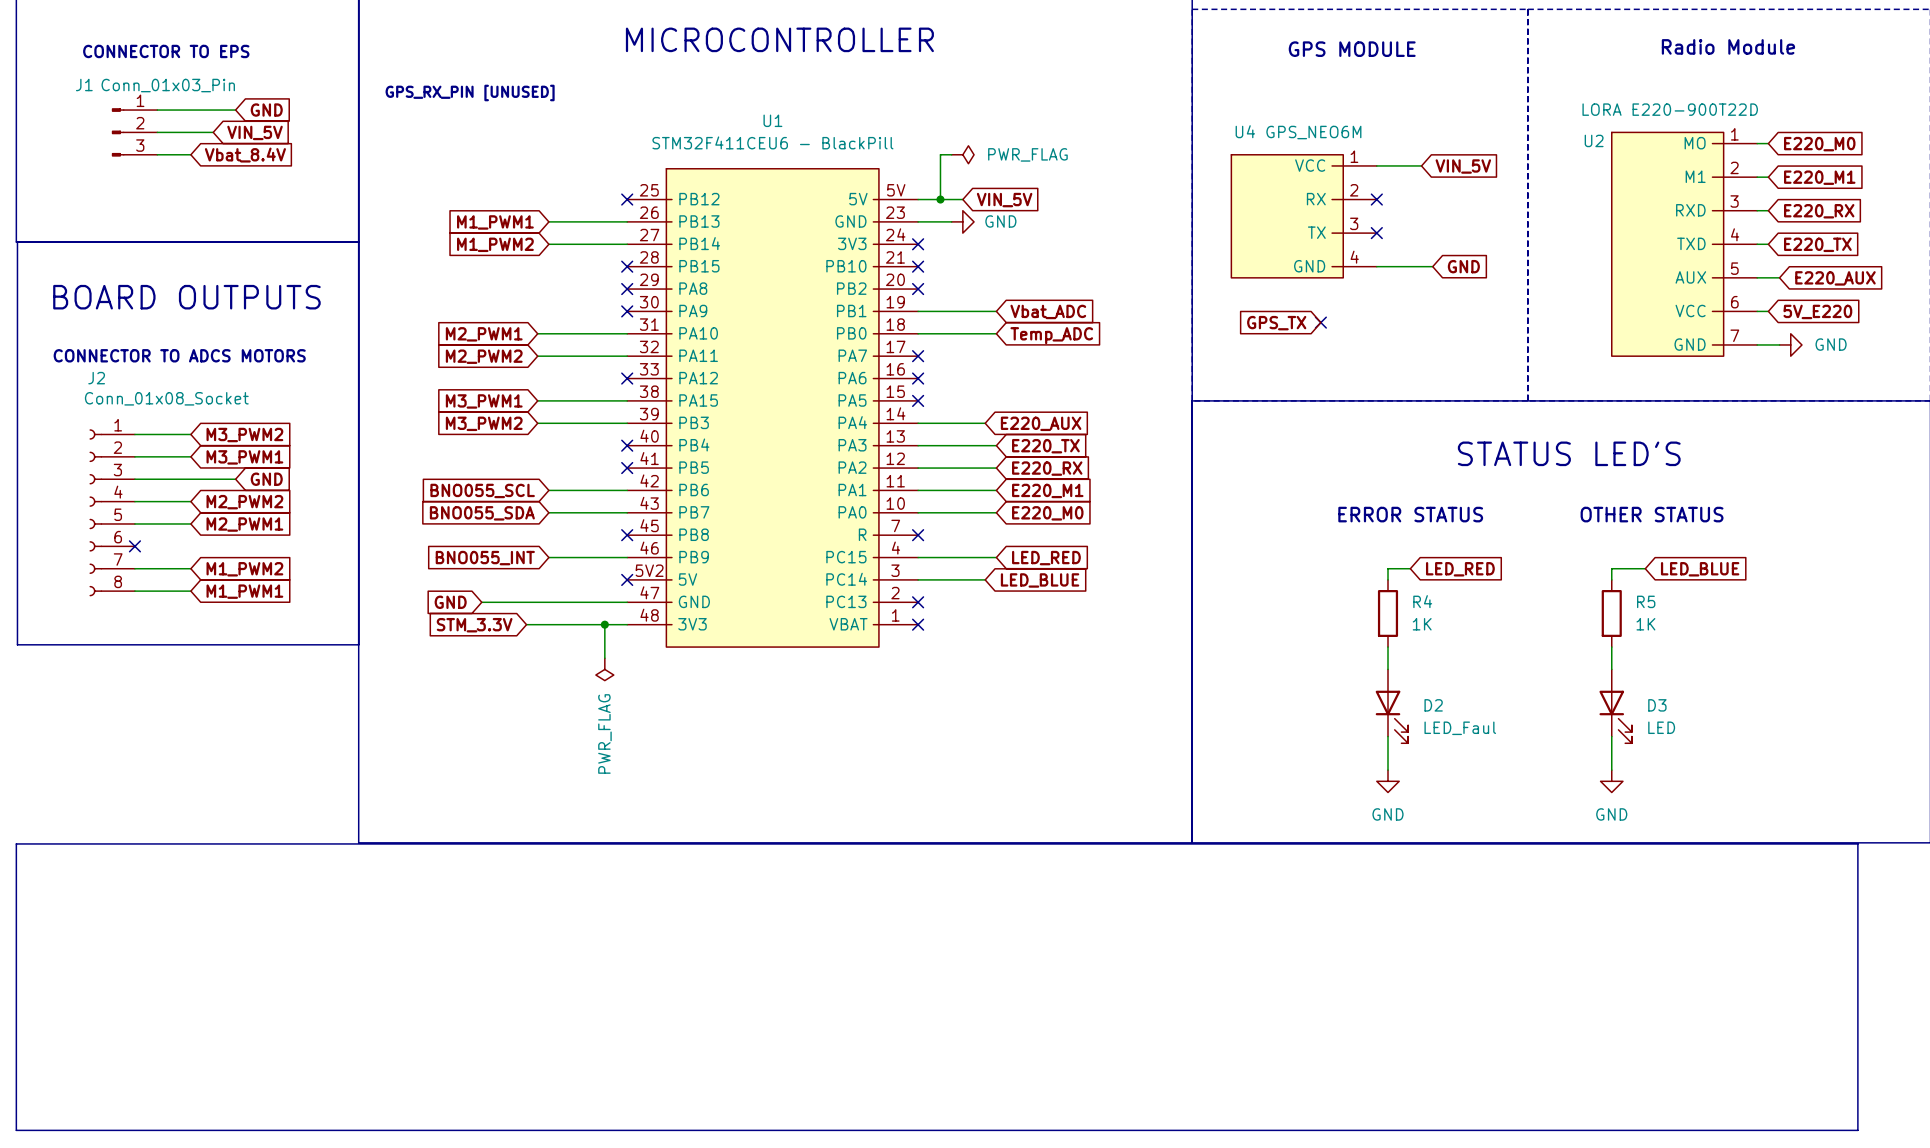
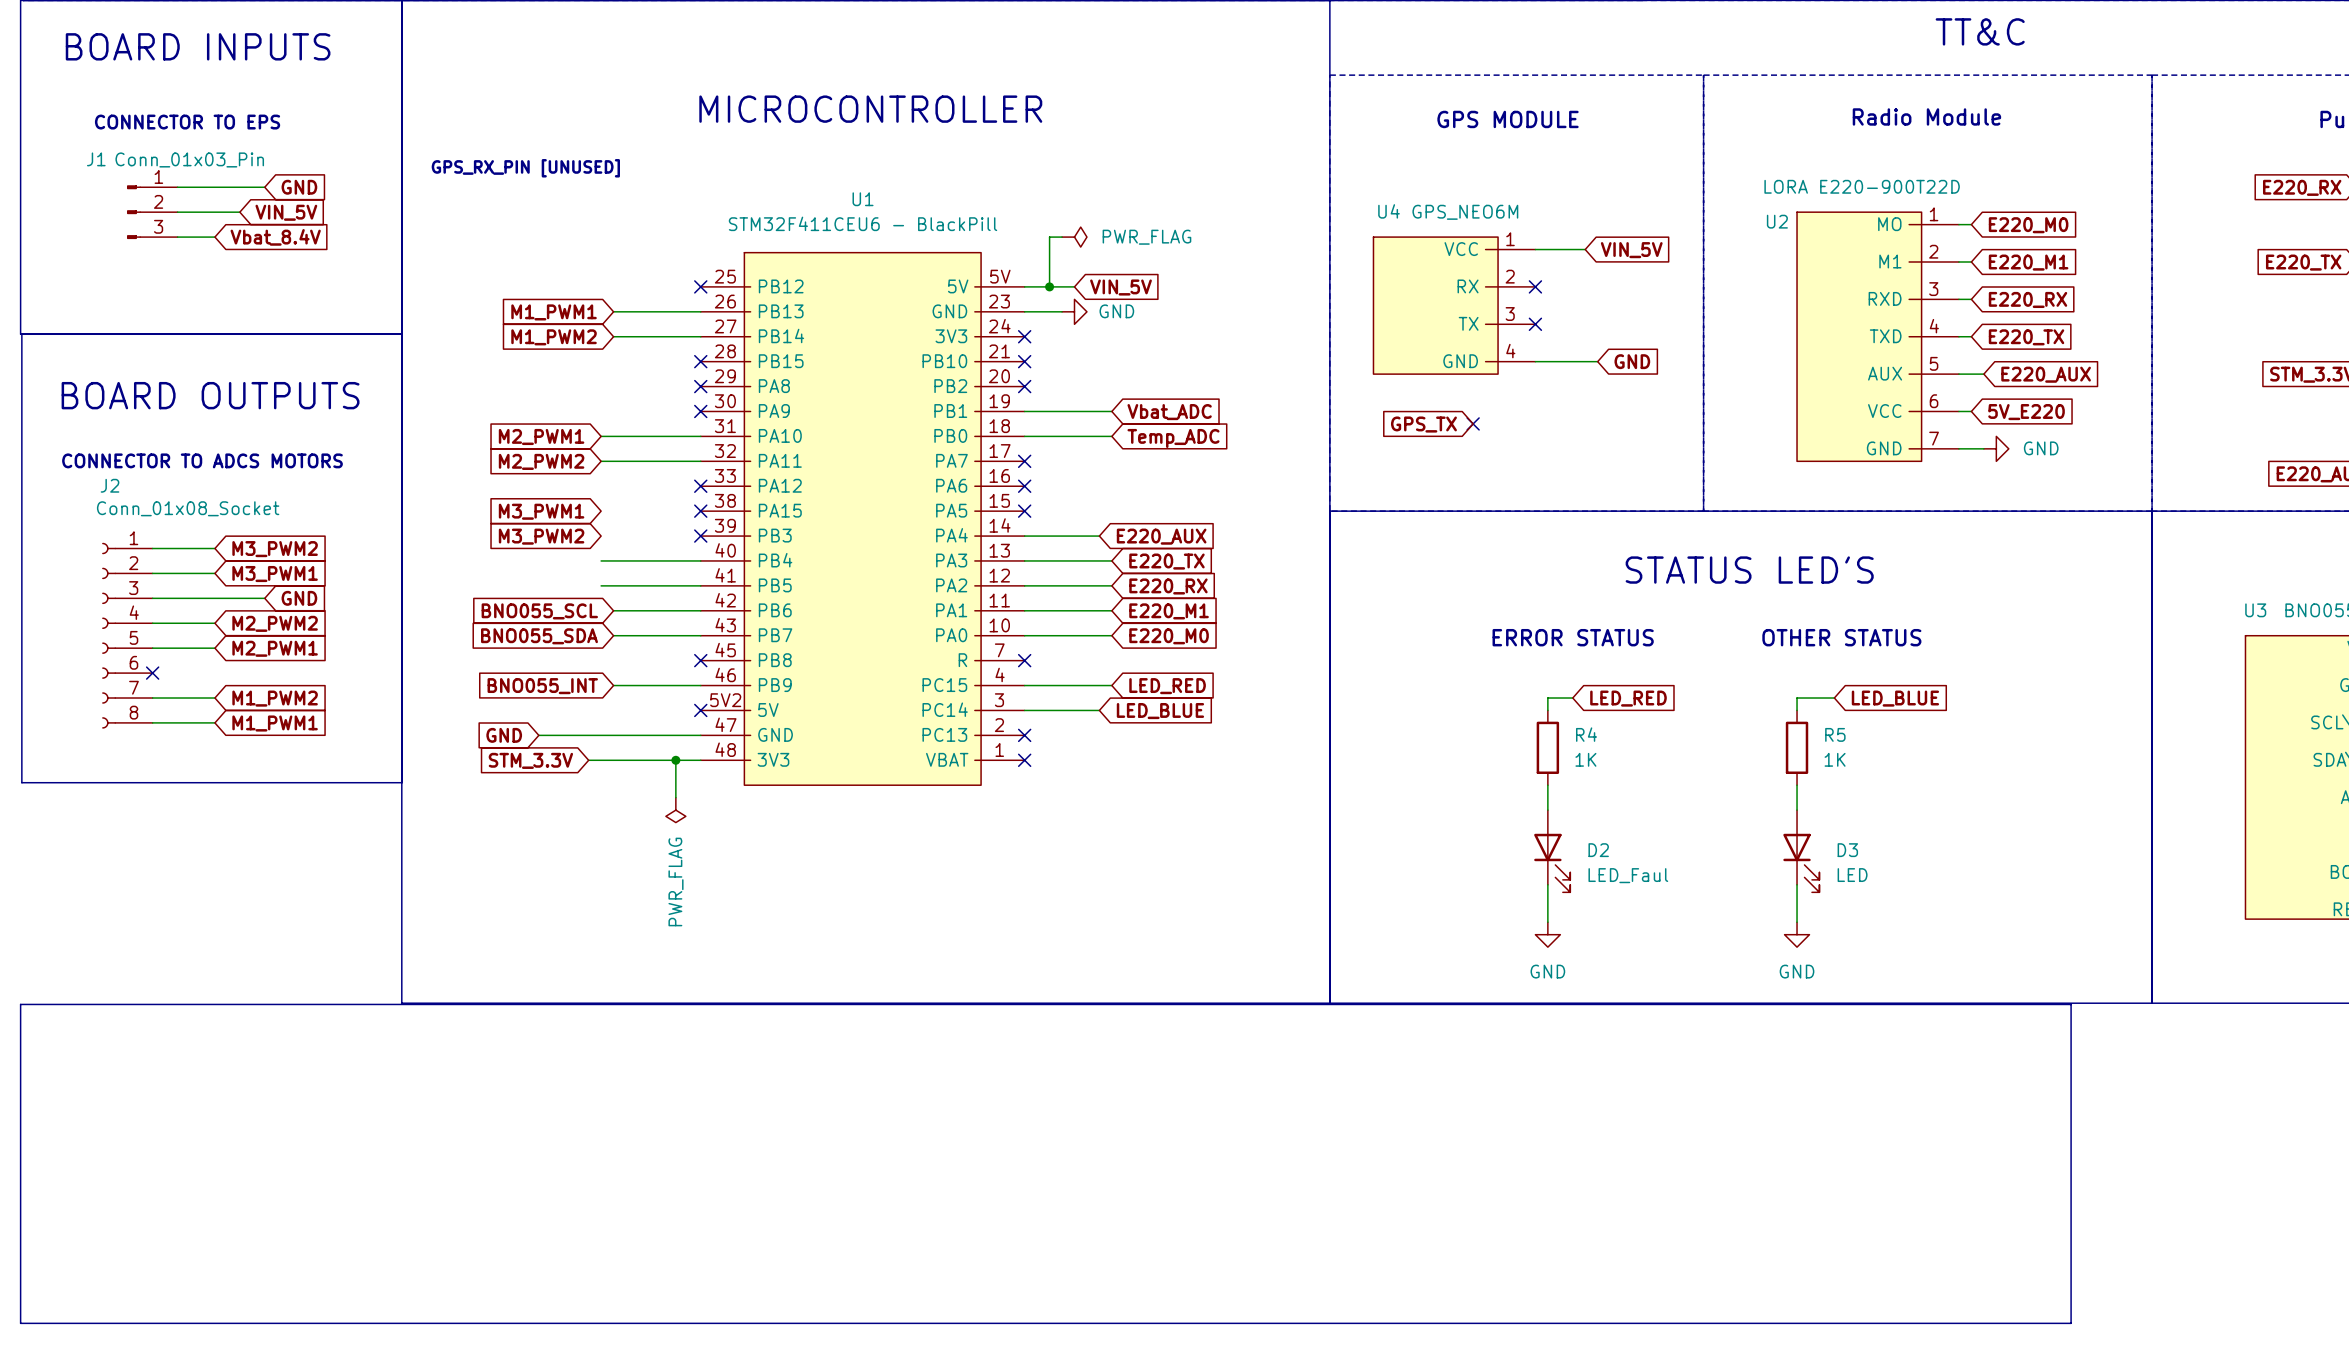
wire: (537, 400) (627, 400) -> (601, 560) (700, 560)
no-connect mark: none -> (700, 511)
wire: (537, 423) (627, 423) -> (601, 585) (700, 585)
no-connect mark: none -> (700, 536)
no-connect mark: (627, 445) -> none
no-connect mark: (627, 468) -> none

